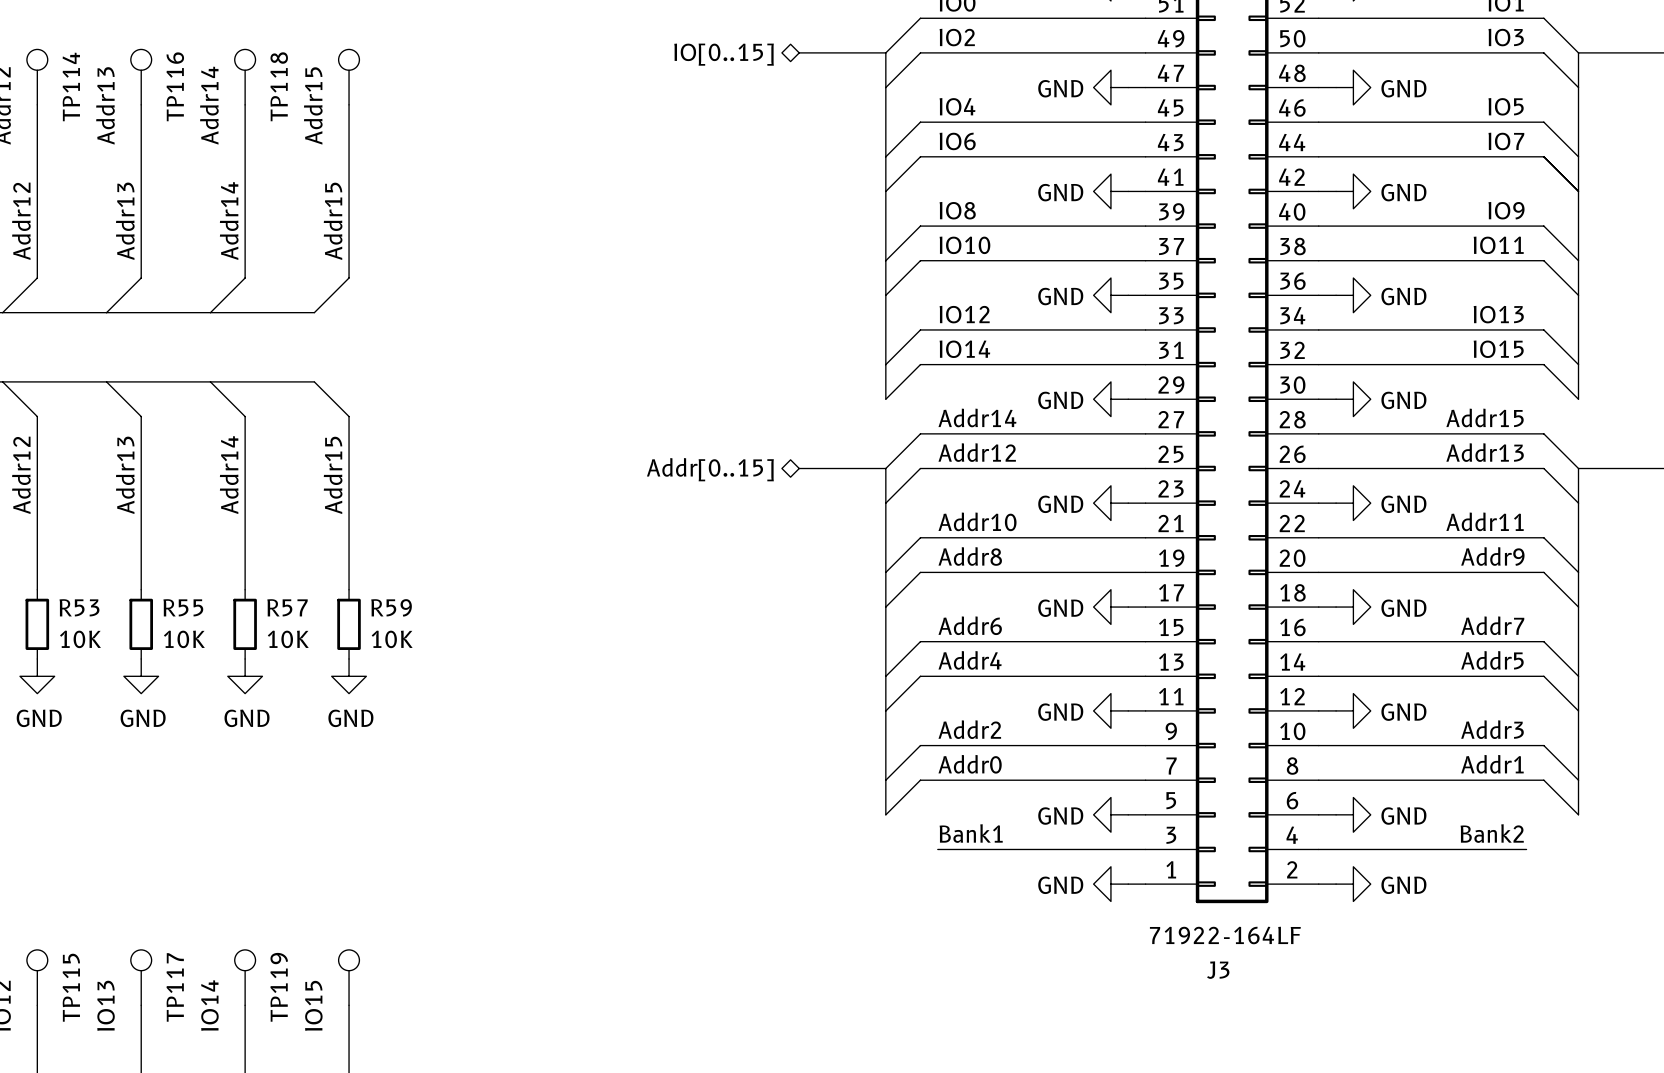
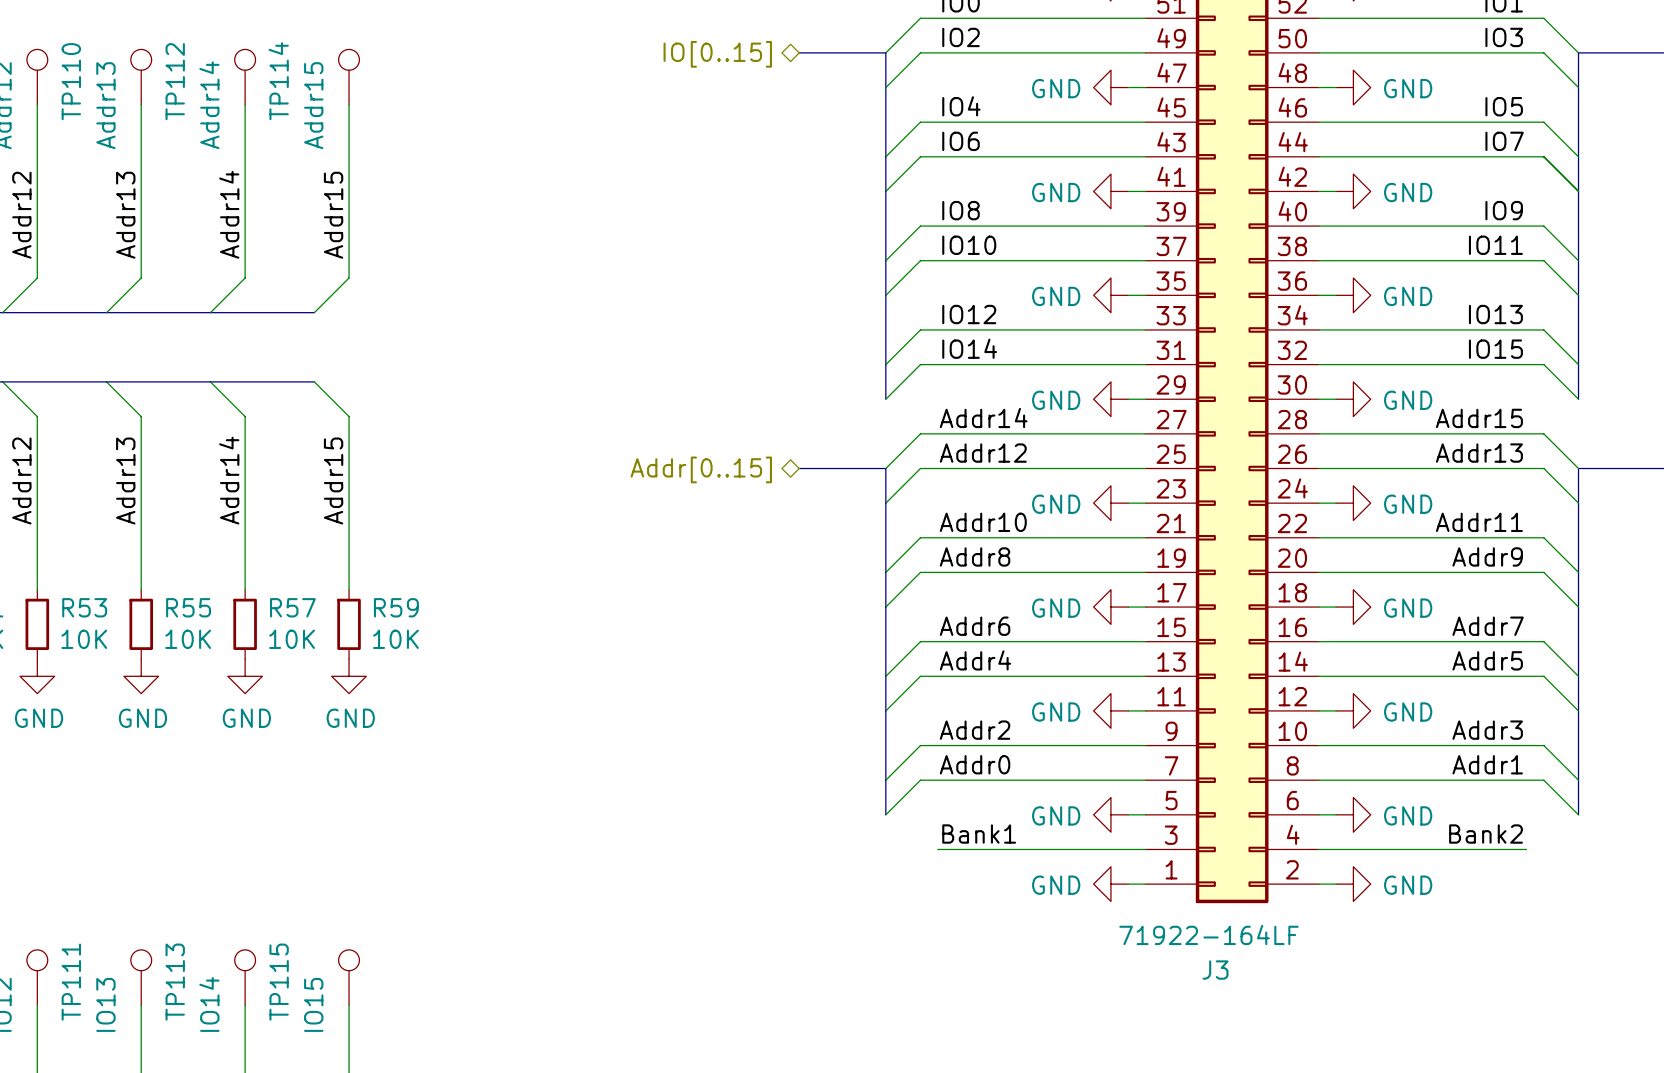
TP114 name: TP114 (71, 86) -> TP110 (71, 81)
TP116 name: TP116 (175, 86) -> TP112 (175, 81)
TP118 name: TP118 (279, 86) -> TP114 (278, 81)
TP115 name: TP115 (71, 987) -> TP111 (71, 982)
TP117 name: TP117 (175, 987) -> TP113 (175, 982)
TP119 name: TP119 (279, 987) -> TP115 (279, 982)

